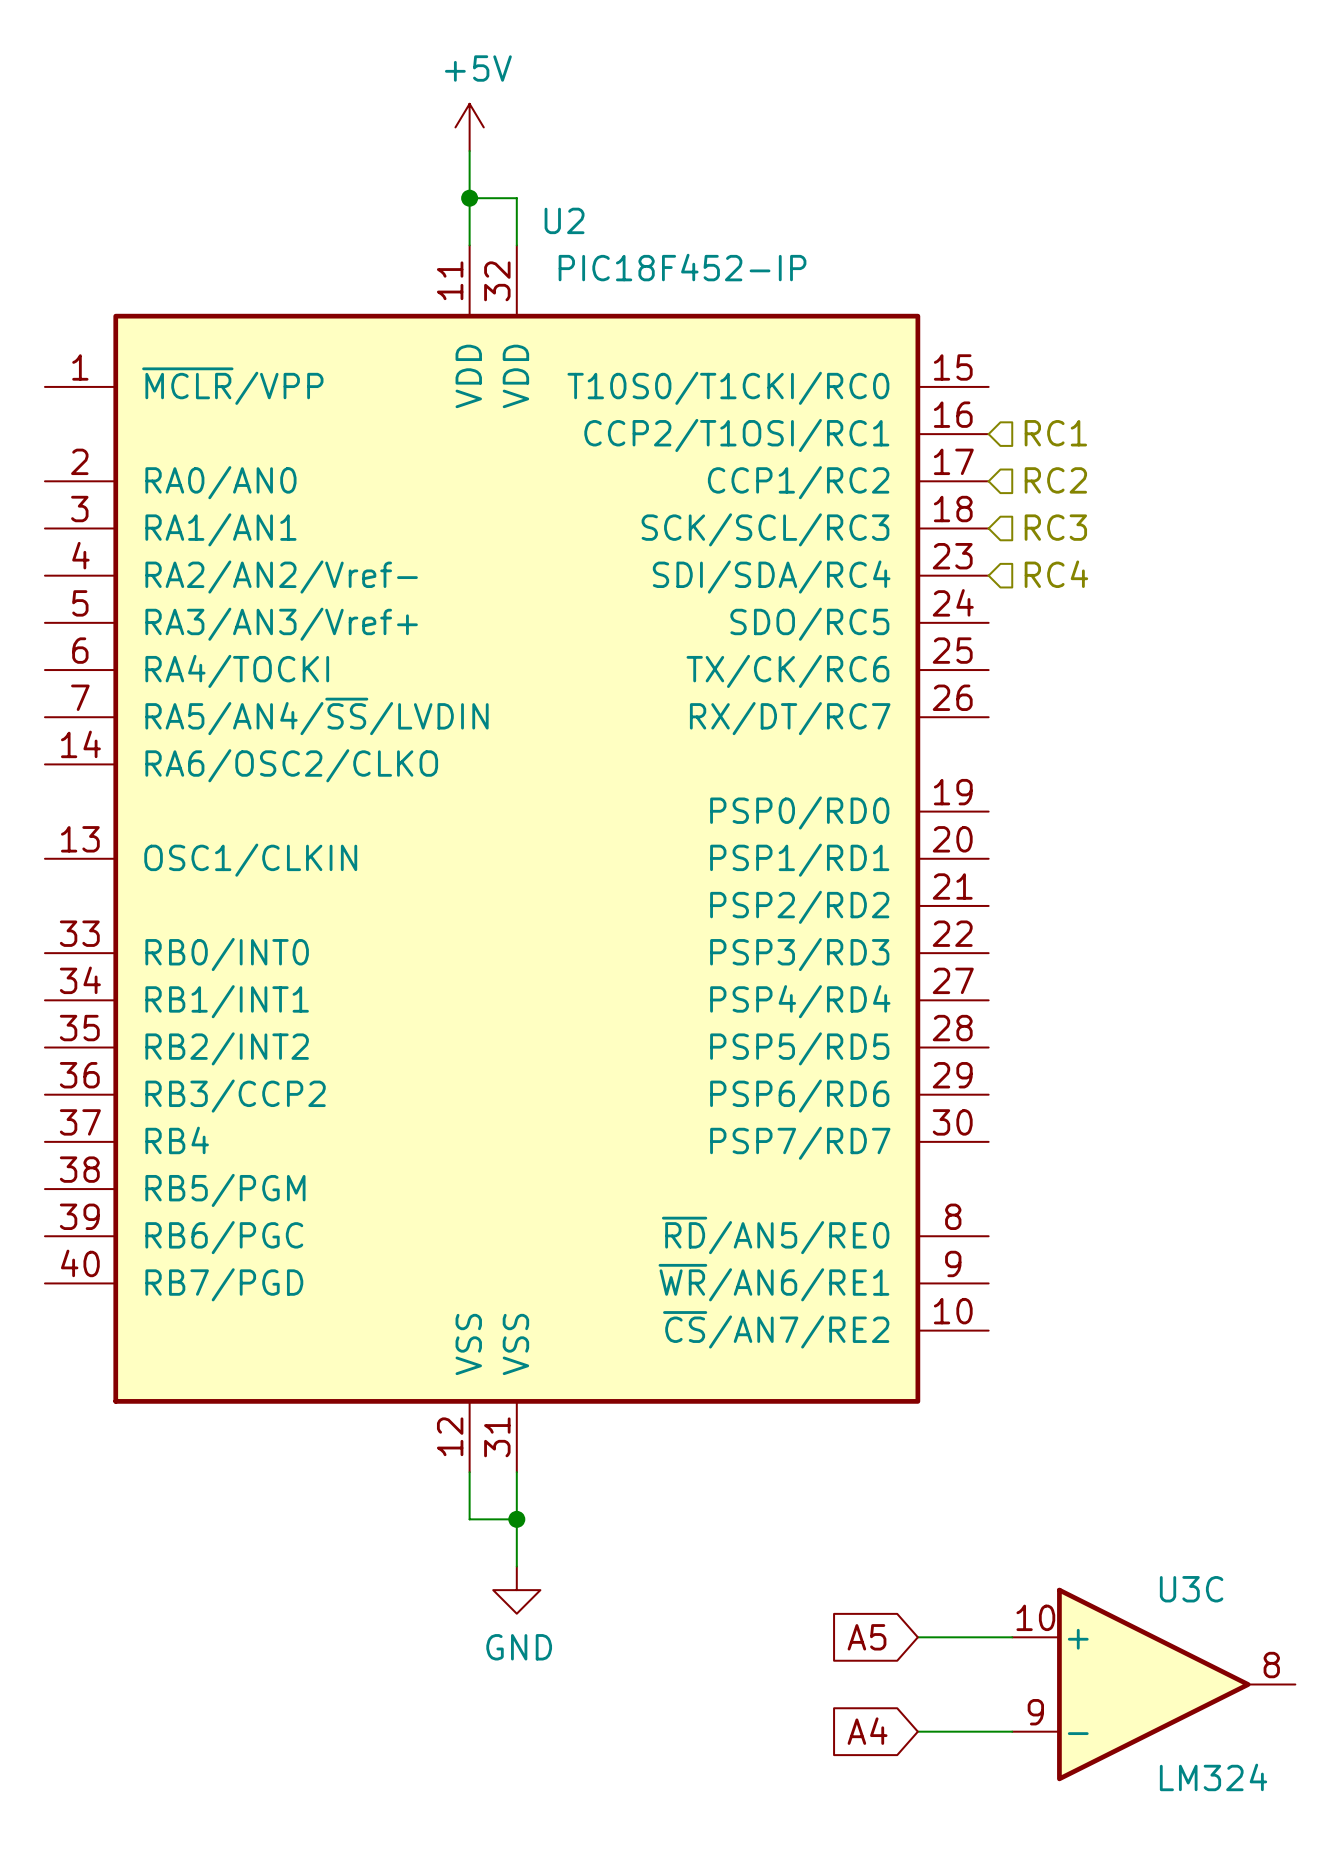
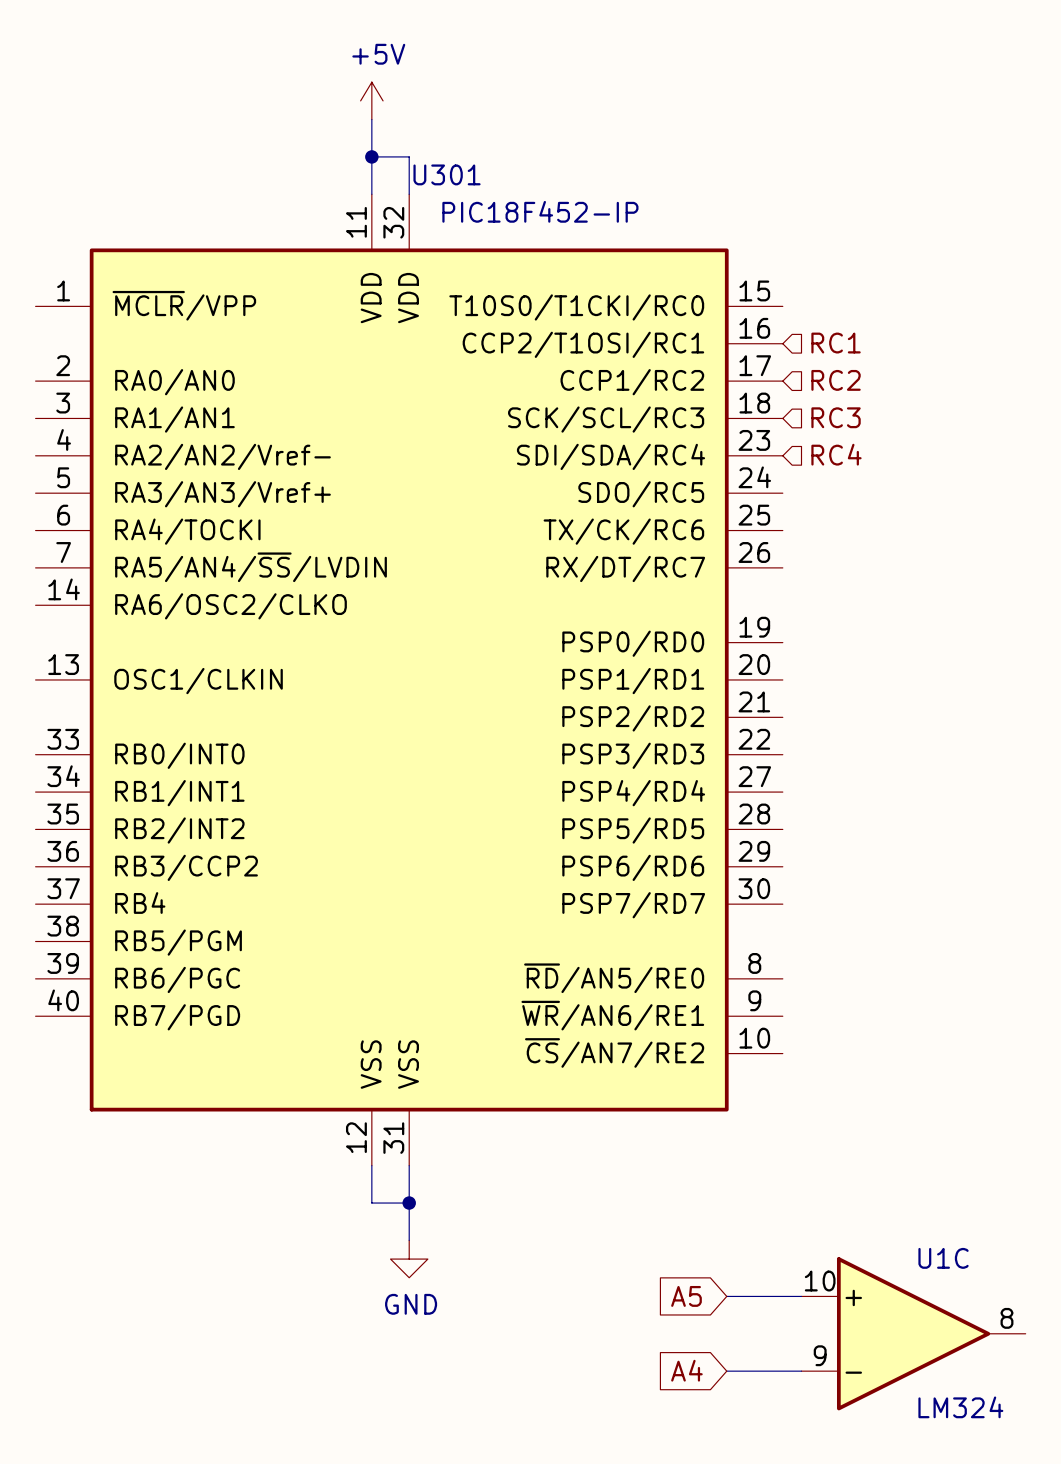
U2 name: U2 (564, 220) -> U301 (447, 174)
U3C name: U3C (1191, 1589) -> U1C (943, 1258)

